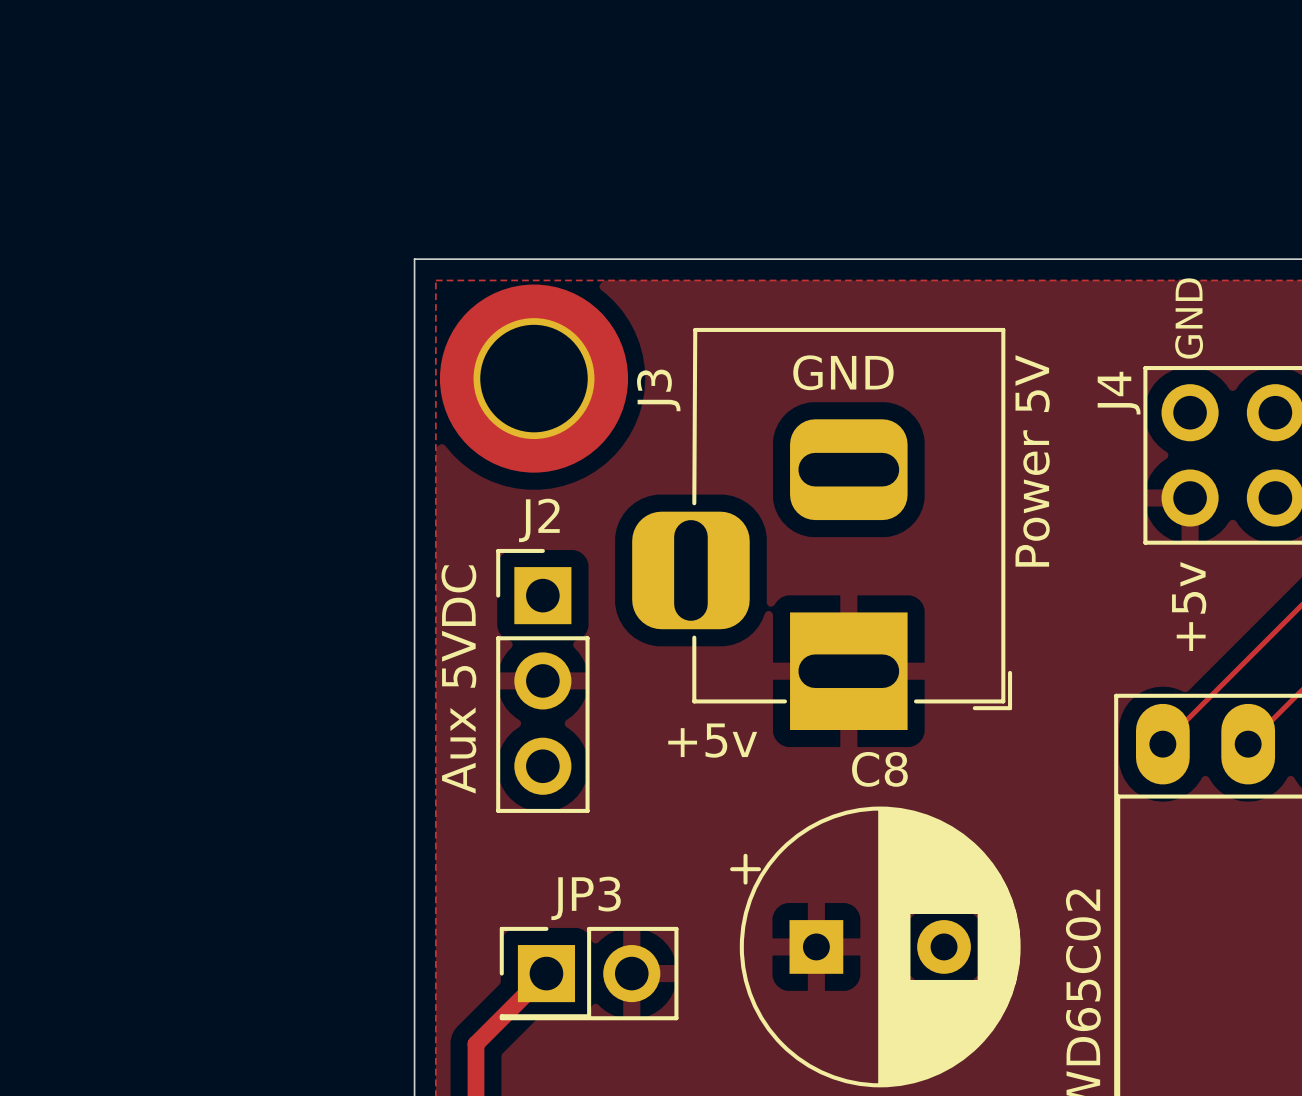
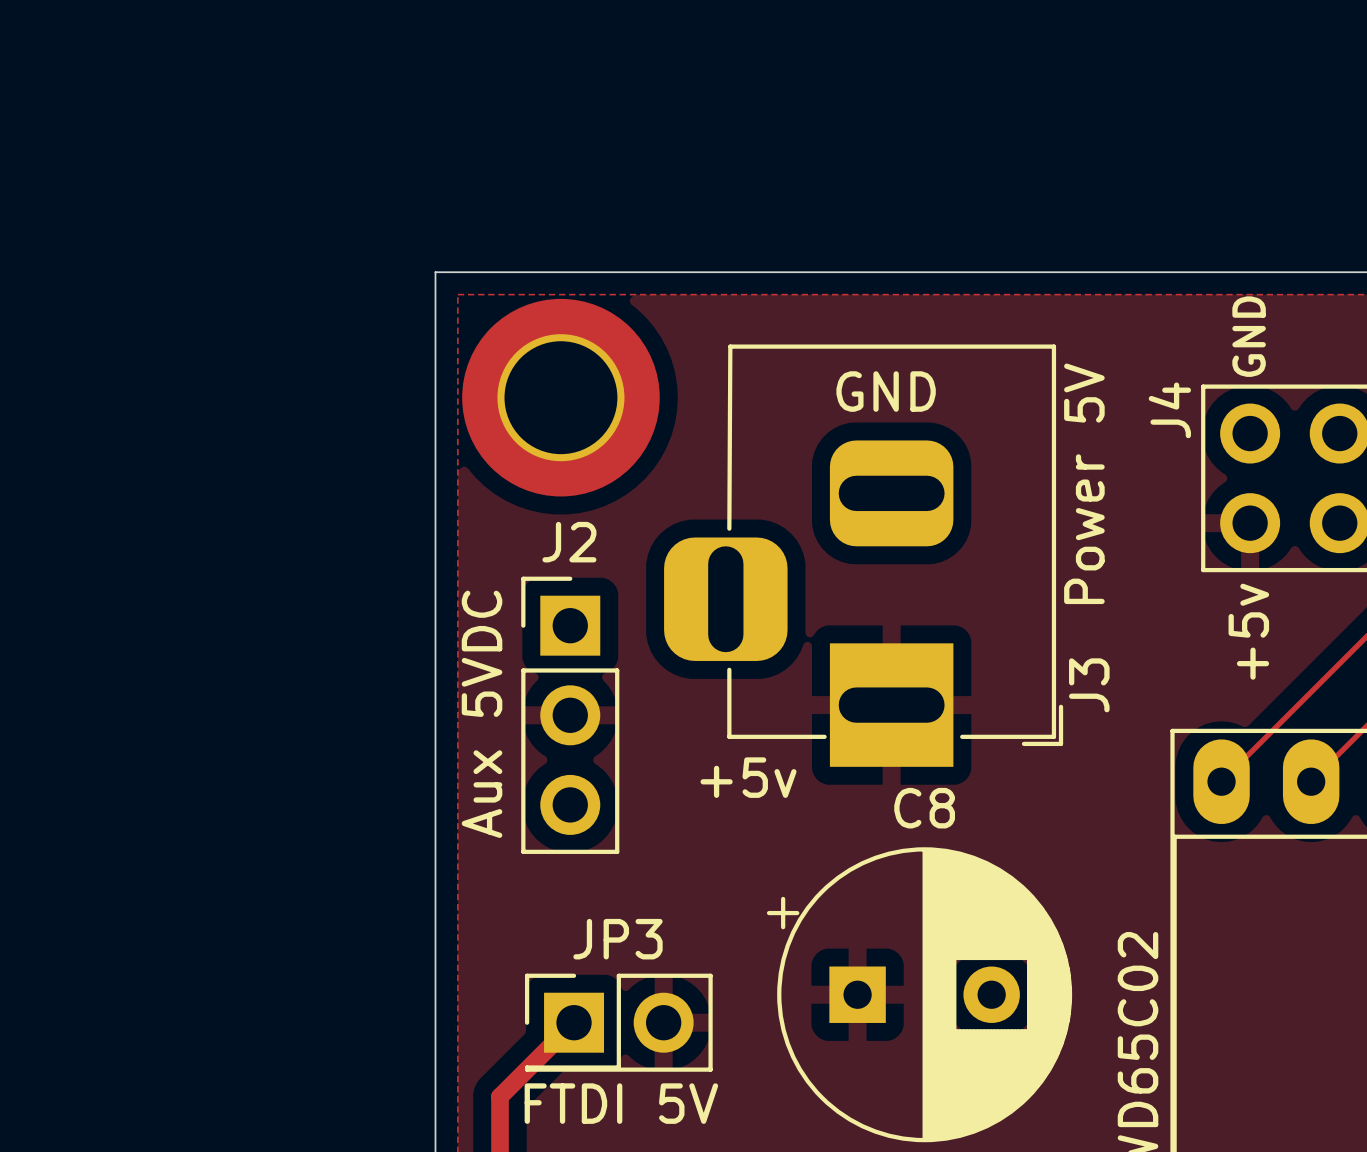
J3 name position: J3 (658, 390) -> J3 (1089, 685)
JP3 value: none -> FTDI 5V (621, 1103)

